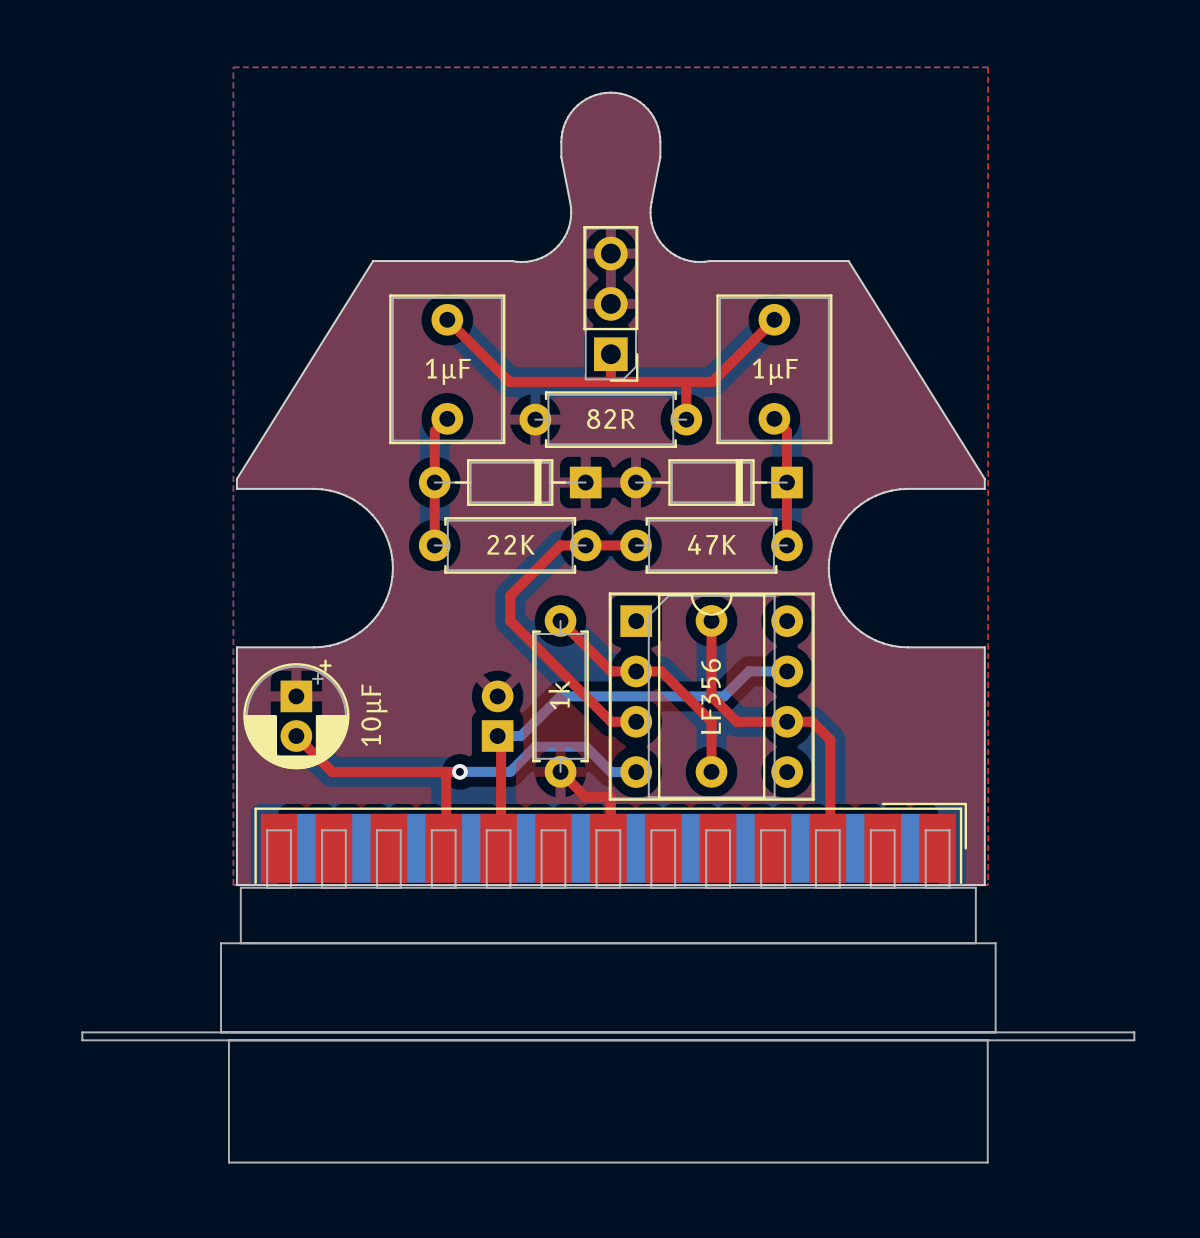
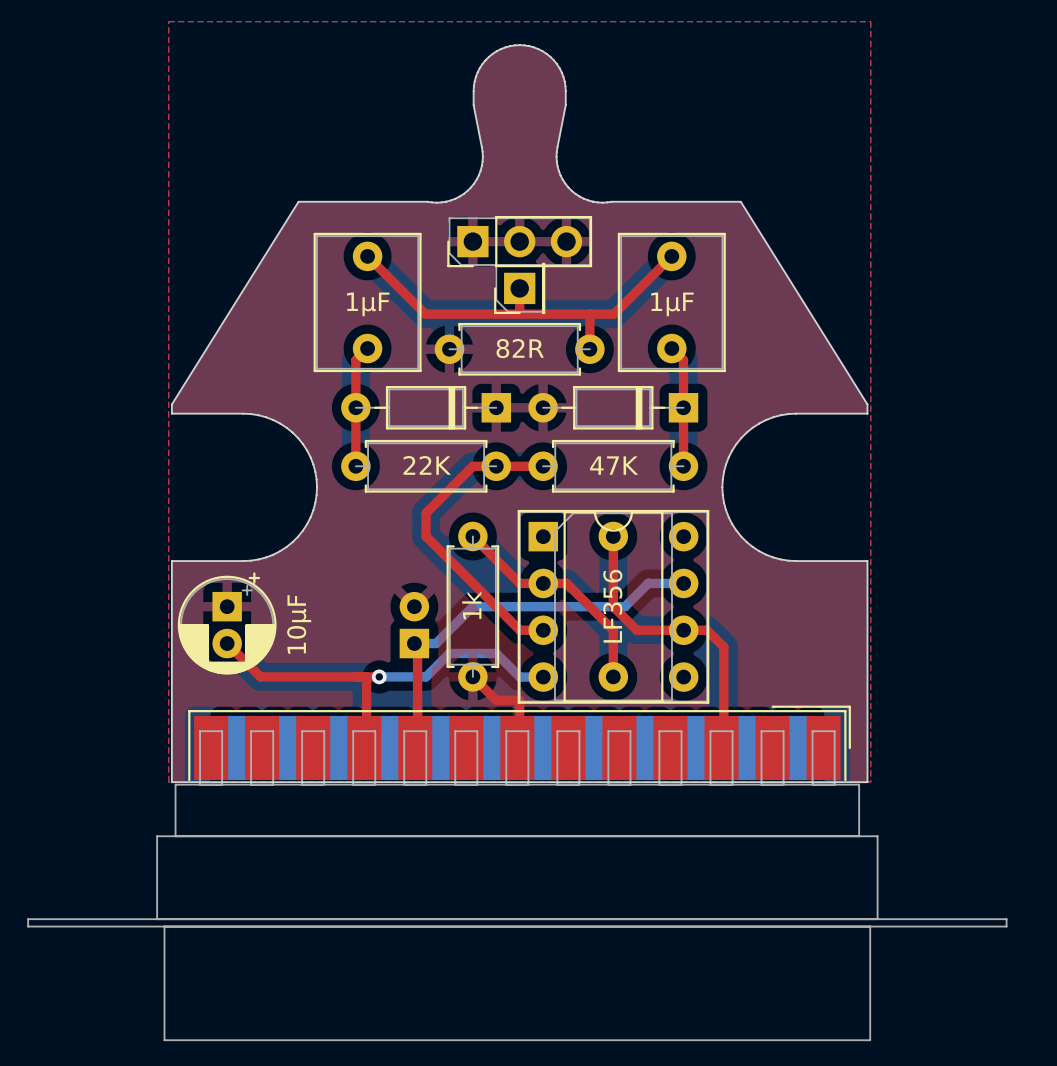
part rotation: 0° (610, 303) -> 90° clockwise (519, 241)
part: none -> (519, 288)

